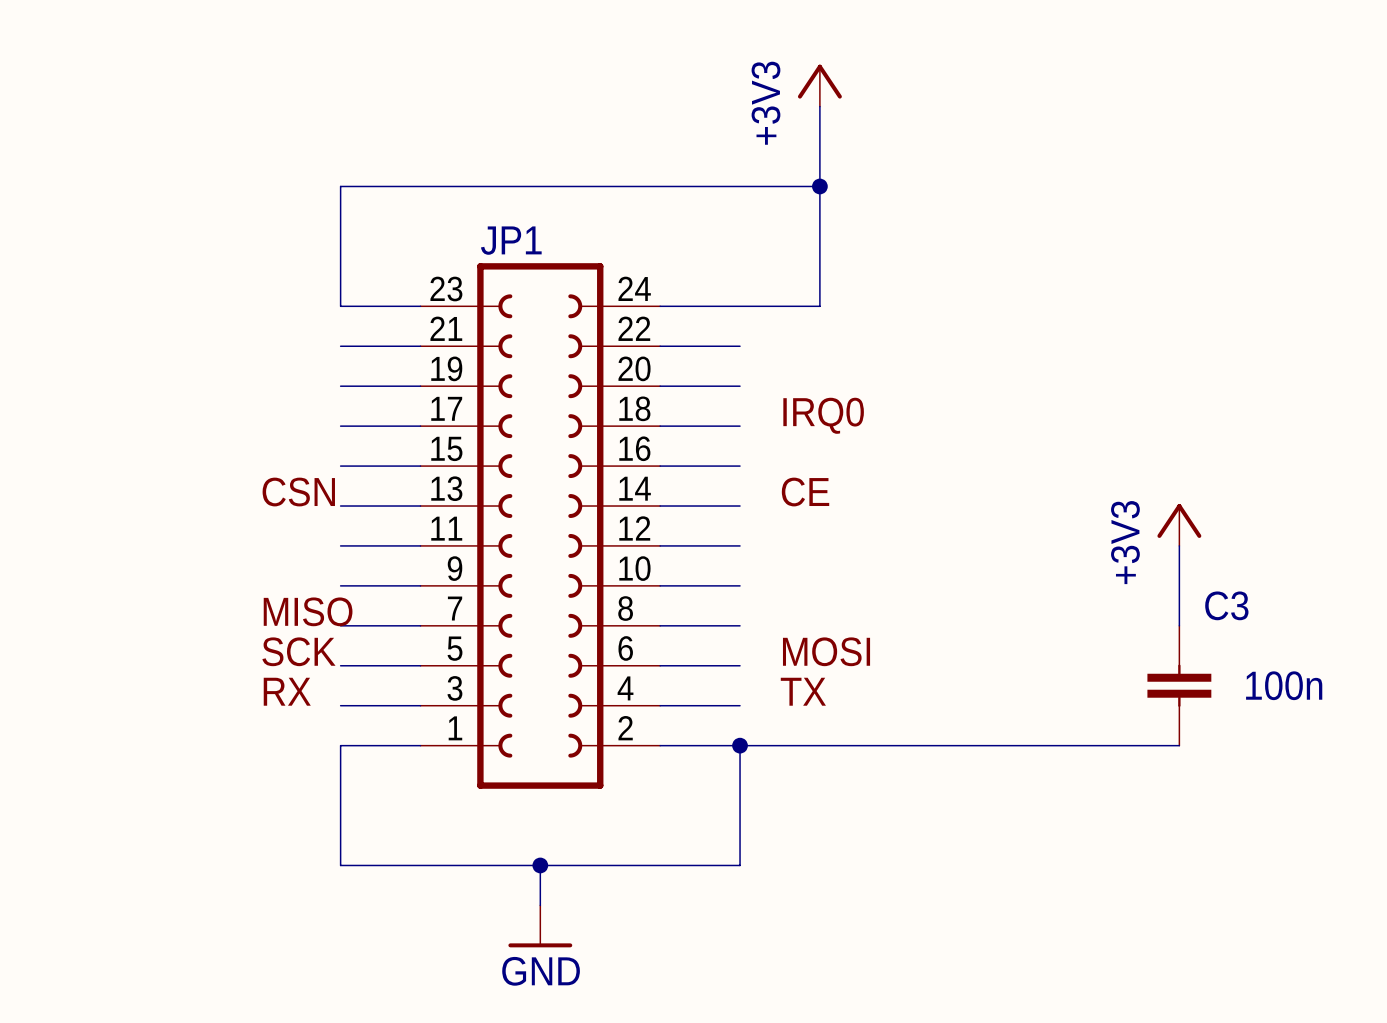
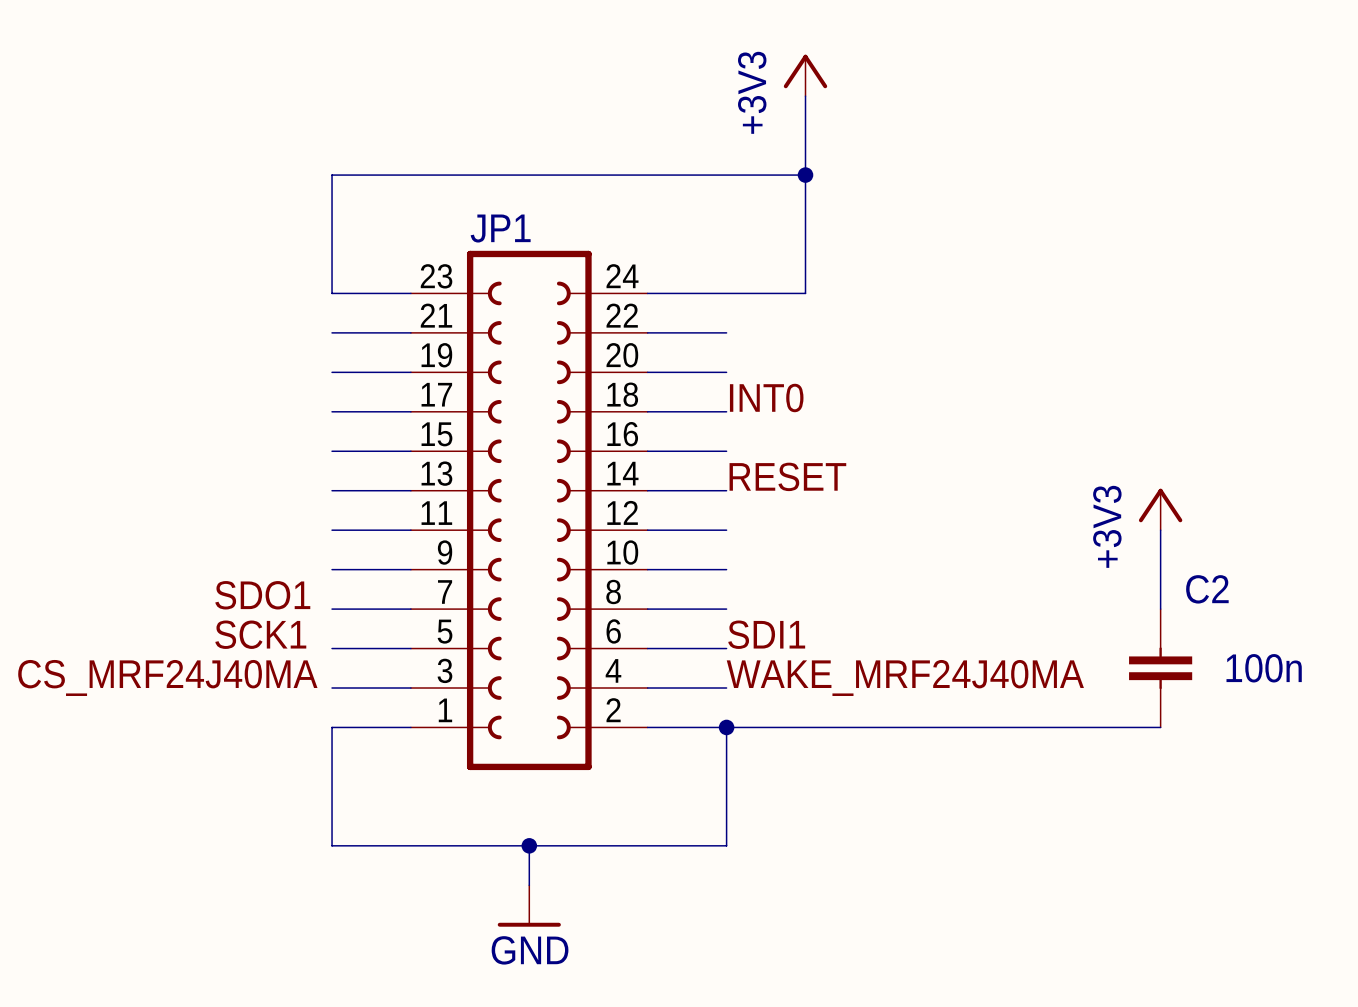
label: none -> INT0 (766, 397)
label: IRQ0 (823, 415) -> none
label: CSN (298, 492) -> none
label: none -> RESET (787, 476)
label: CE (805, 492) -> none
C3 name: C3 (1226, 605) -> C2 (1207, 589)
label: none -> SDO1 (262, 595)
label: MISO (308, 611) -> none
label: SCK (298, 651) -> SCK1 (260, 634)
label: none -> SDI1 (766, 634)
label: MOSI (826, 651) -> none
label: RX (287, 691) -> none
label: TX (803, 691) -> none
label: none -> CS_MRF24J40MA (167, 677)
label: none -> WAKE_MRF24J40MA (905, 677)

